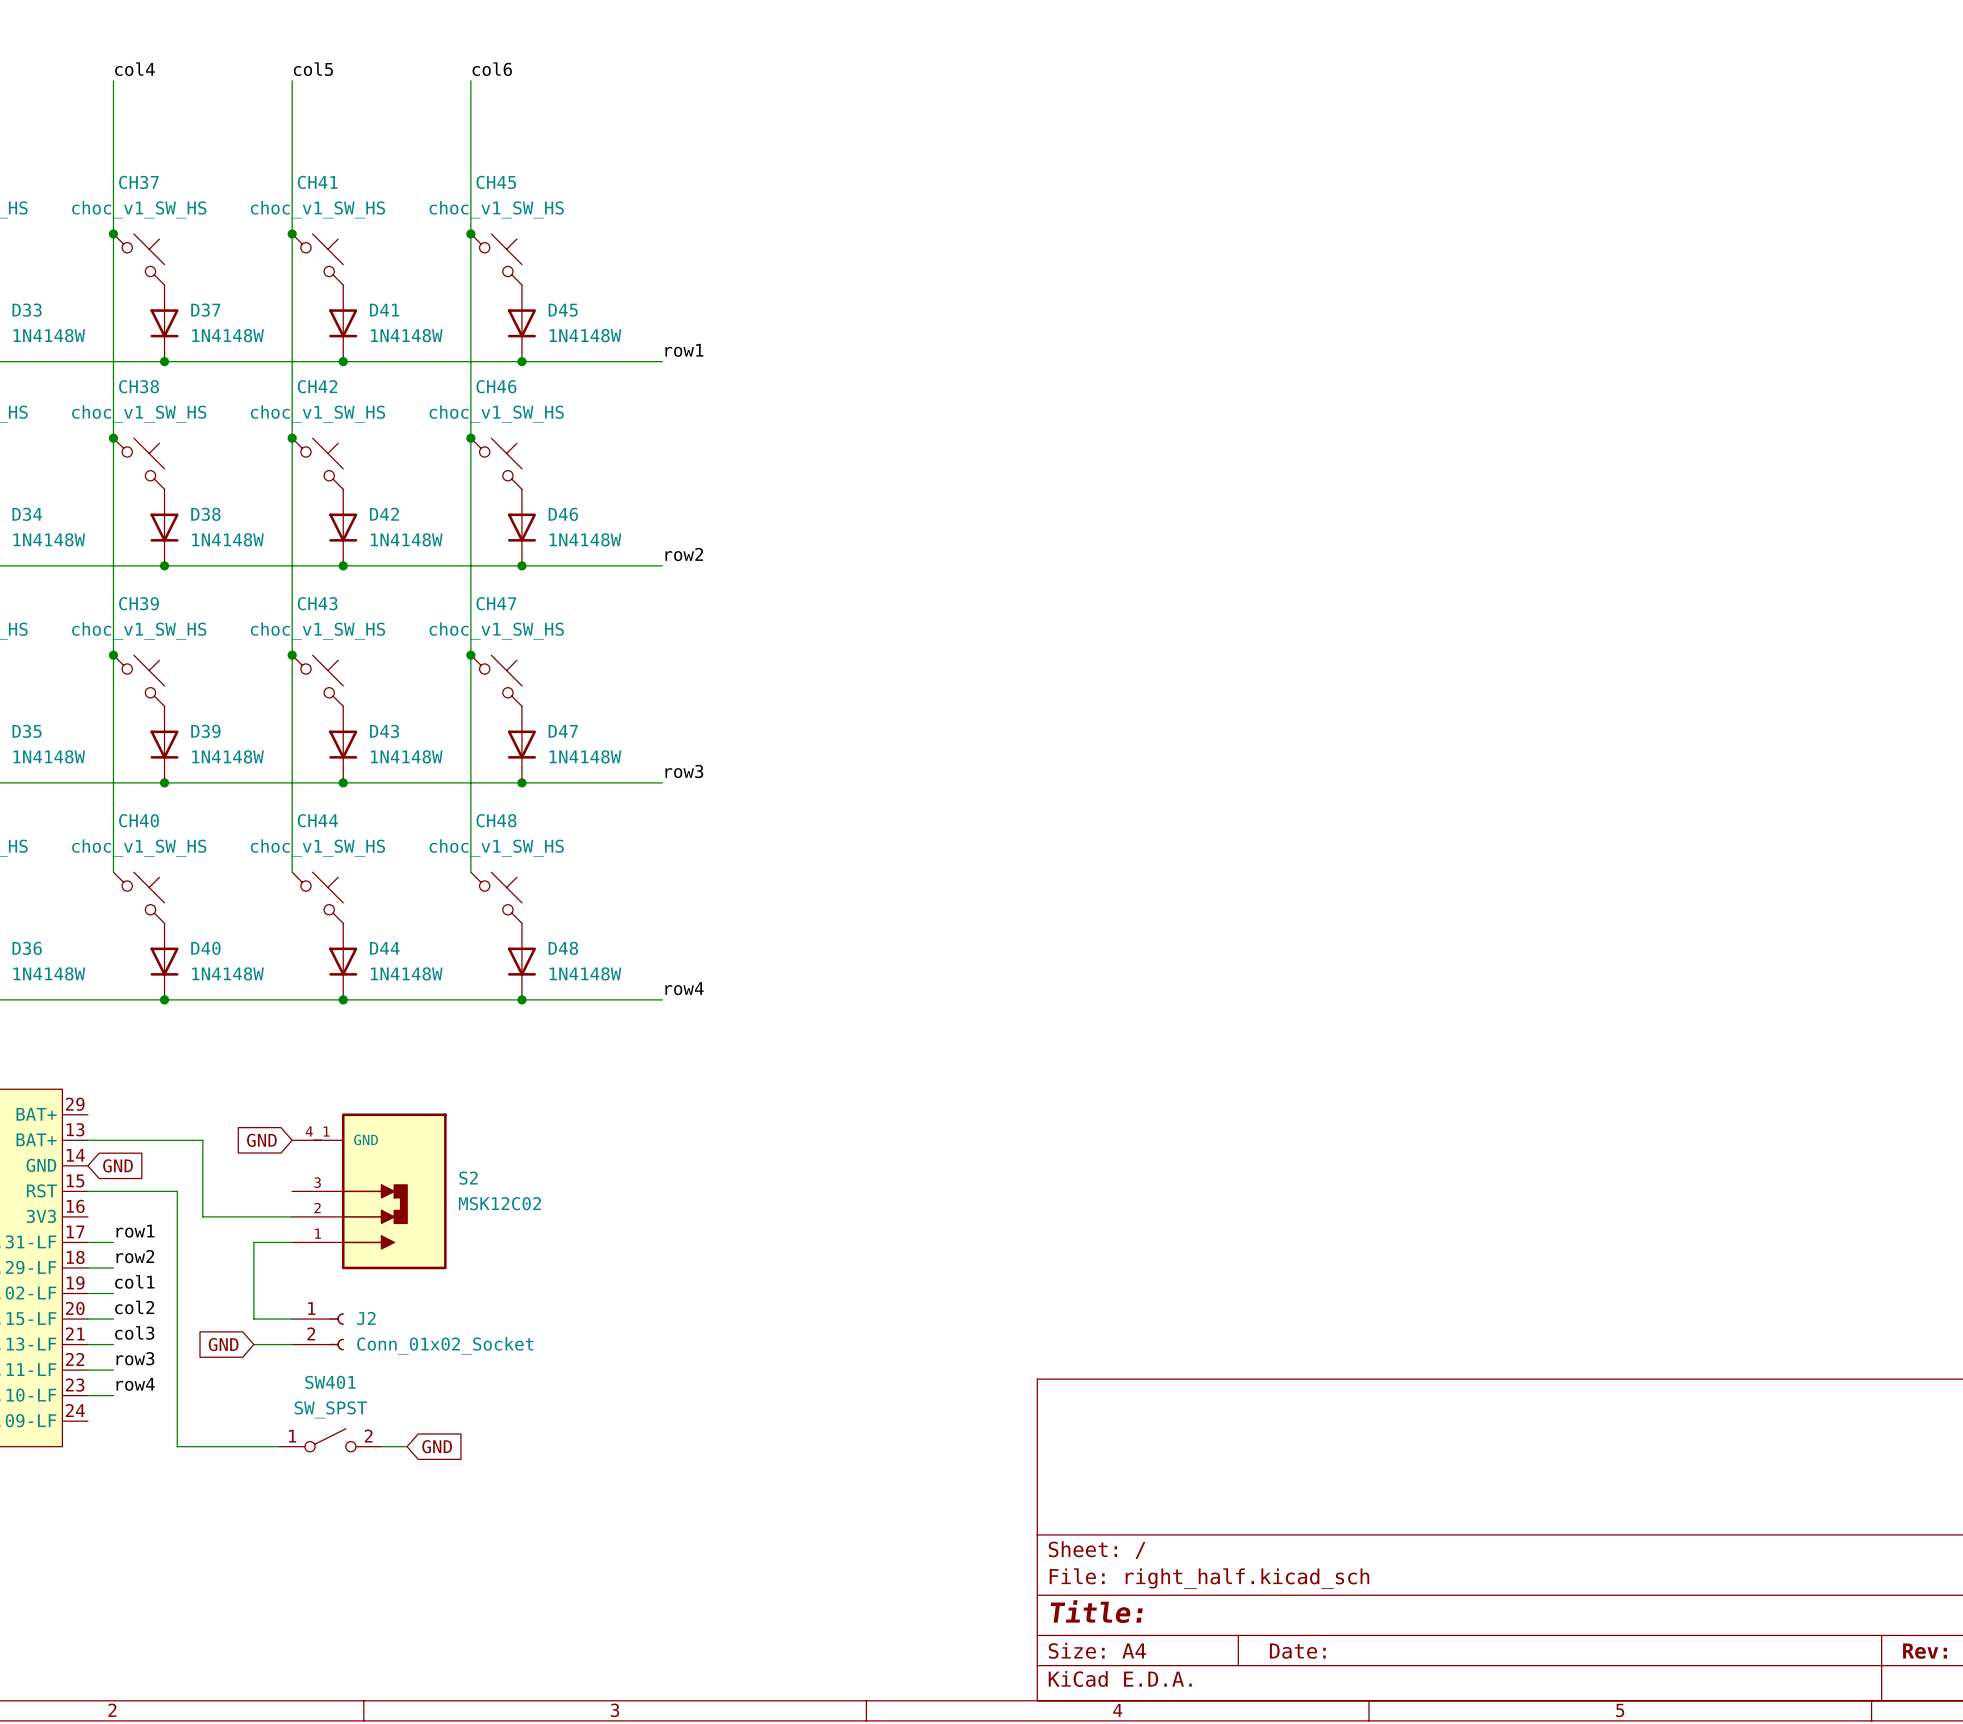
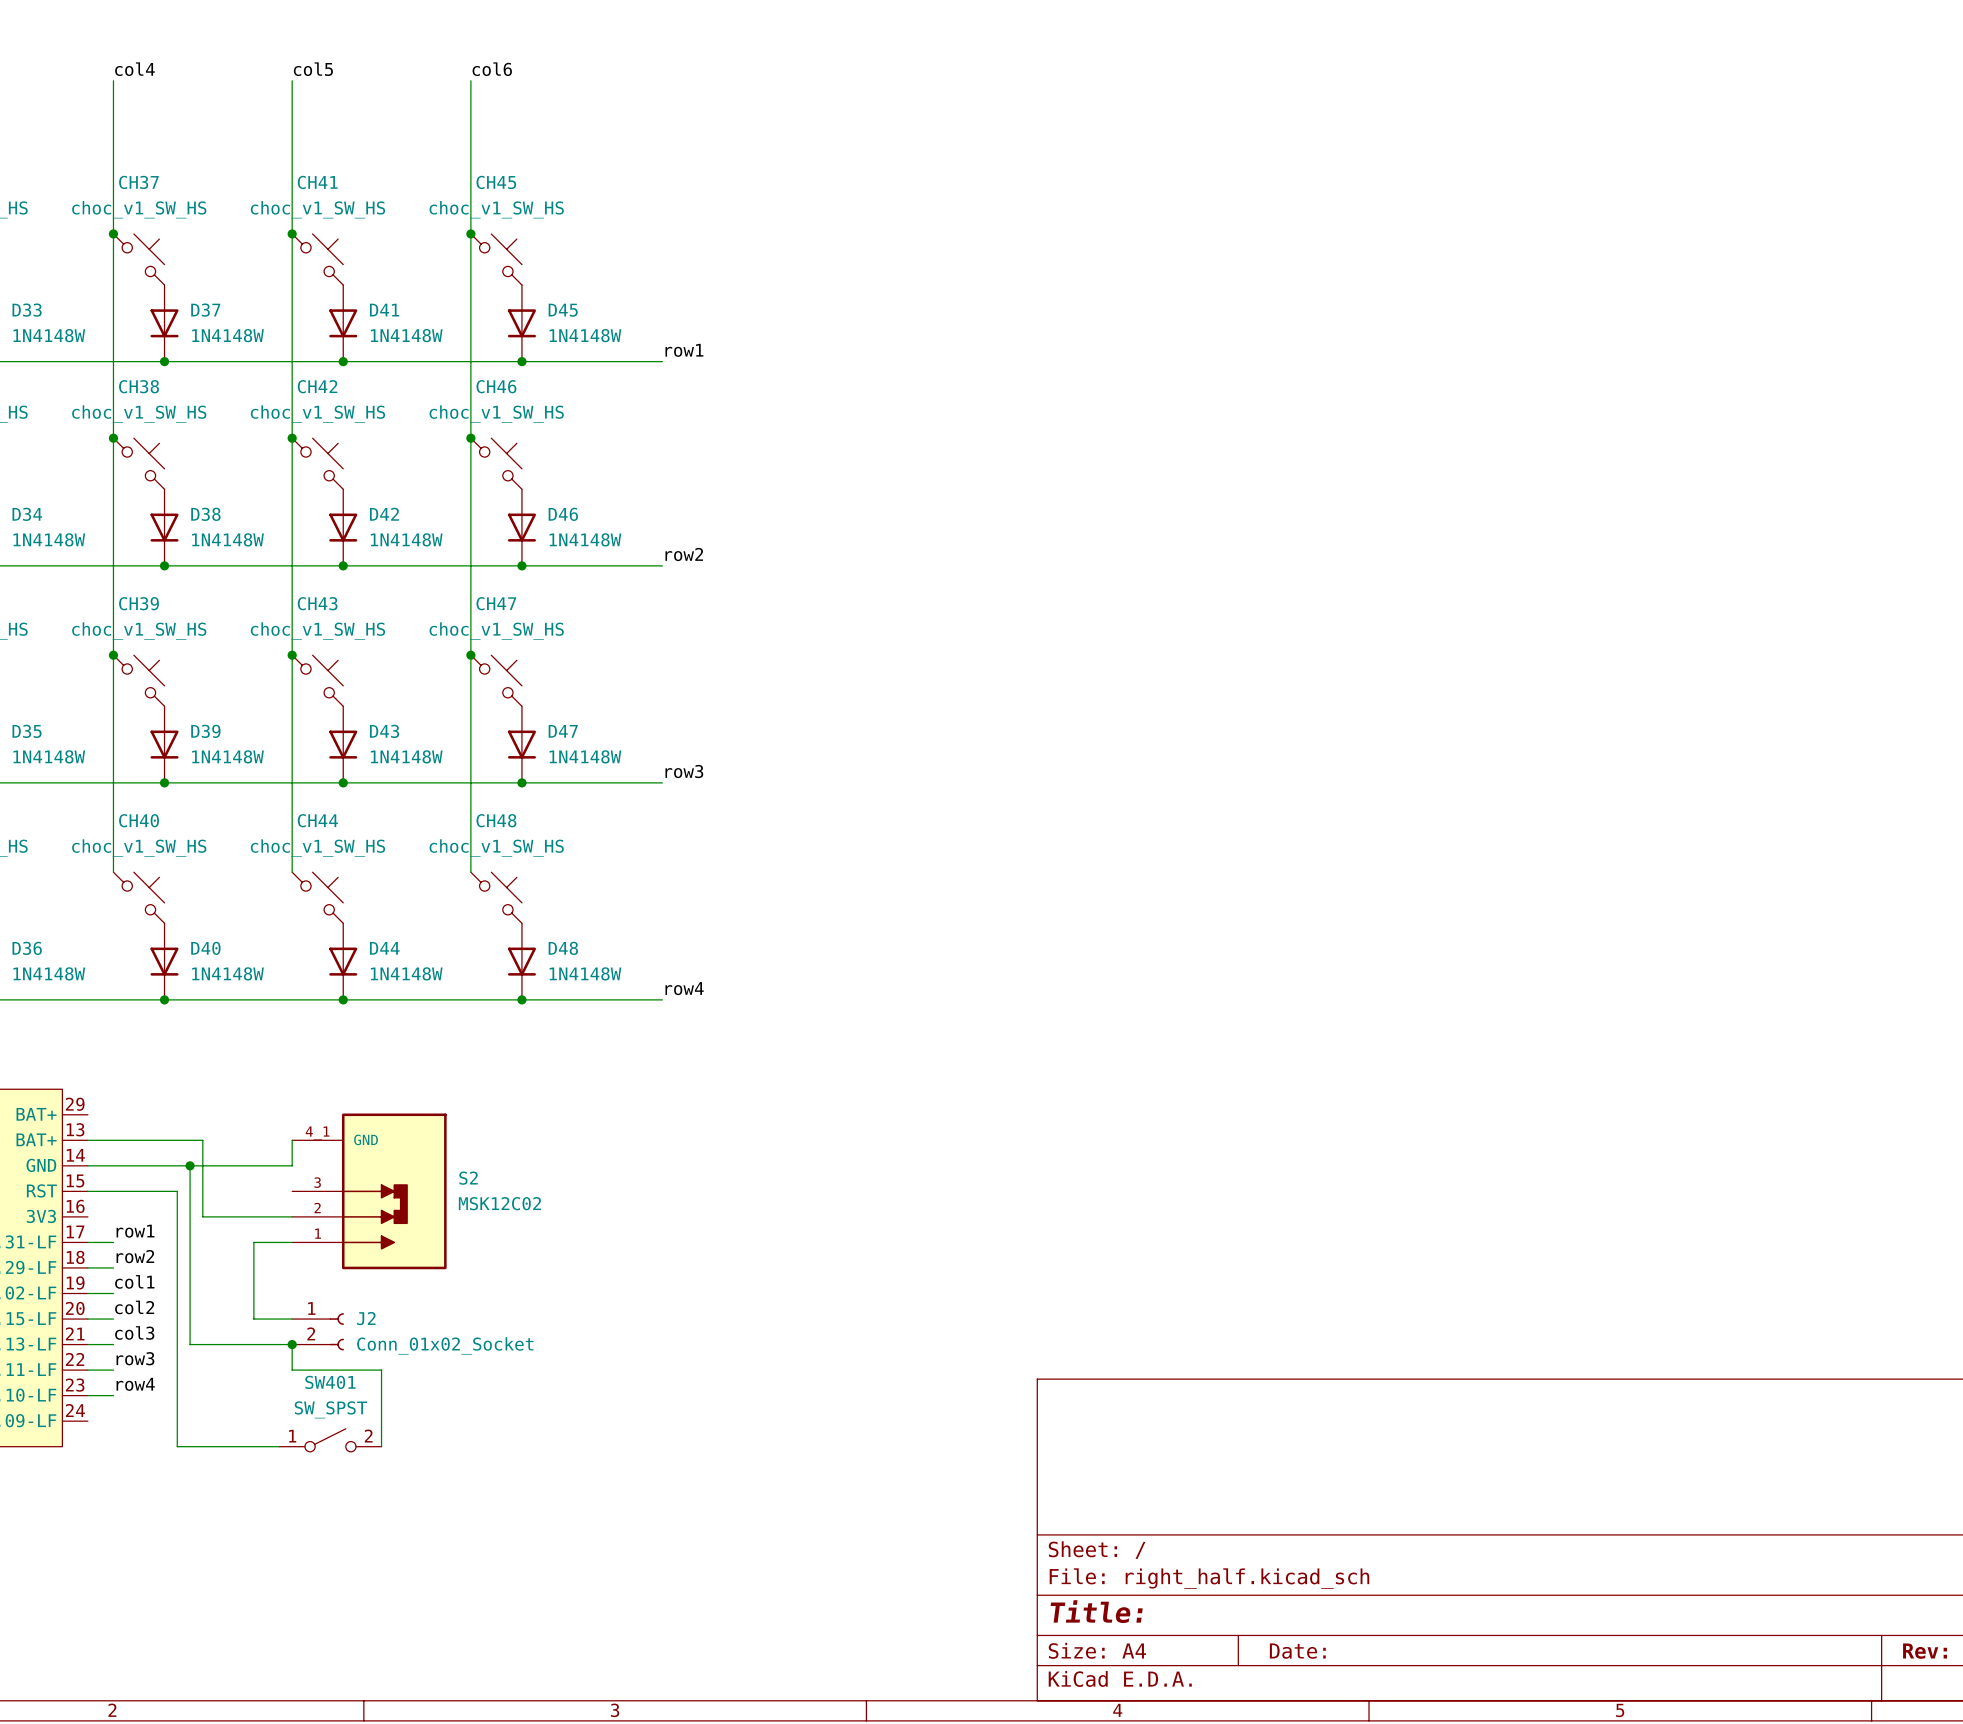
global label: GND (261, 1140) -> none
wire: none -> (292, 1140) (292, 1165) (87, 1165)
global label: GND (118, 1165) -> none
wire: none -> (190, 1165) (190, 1344) (253, 1344)
junction: none -> (190, 1165)
global label: GND (223, 1344) -> none
junction: none -> (292, 1344)
wire: (381, 1446) (407, 1446) -> (381, 1446) (381, 1370) (292, 1370) (292, 1344)
global label: GND (437, 1446) -> none

